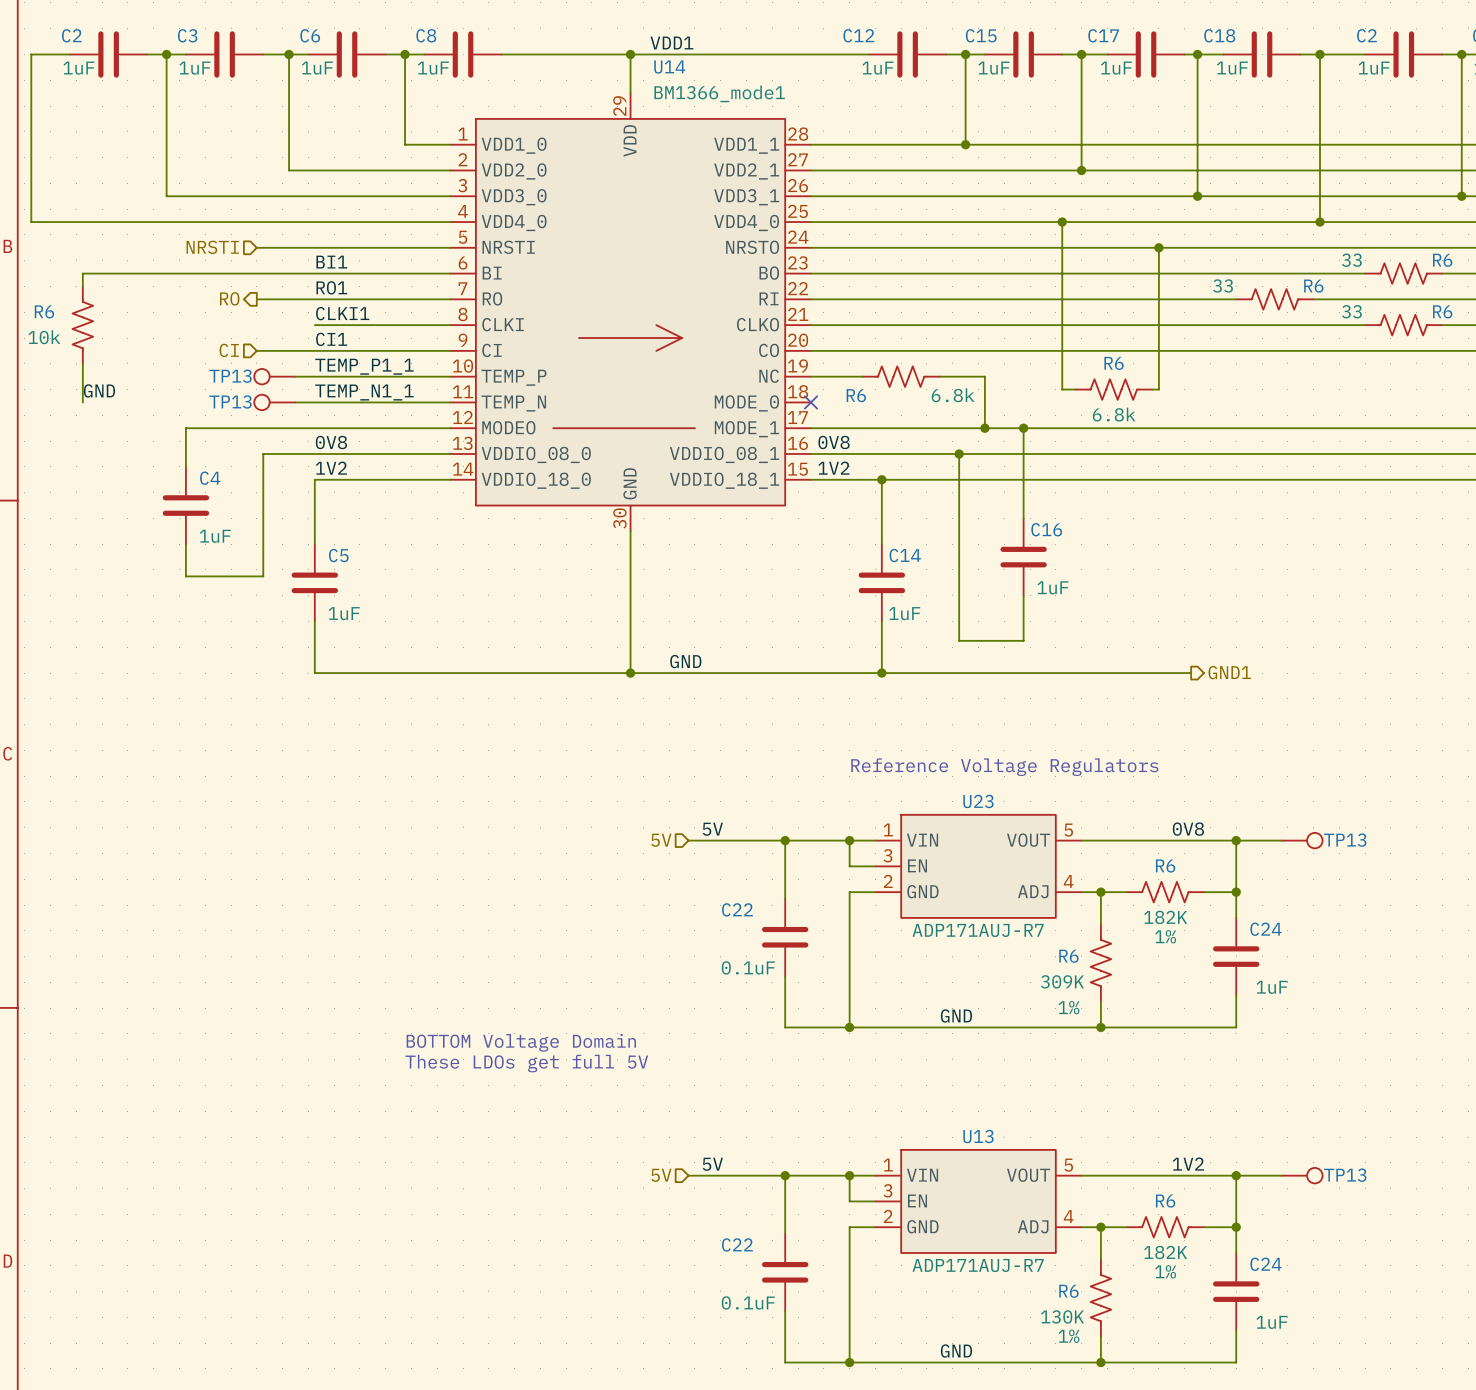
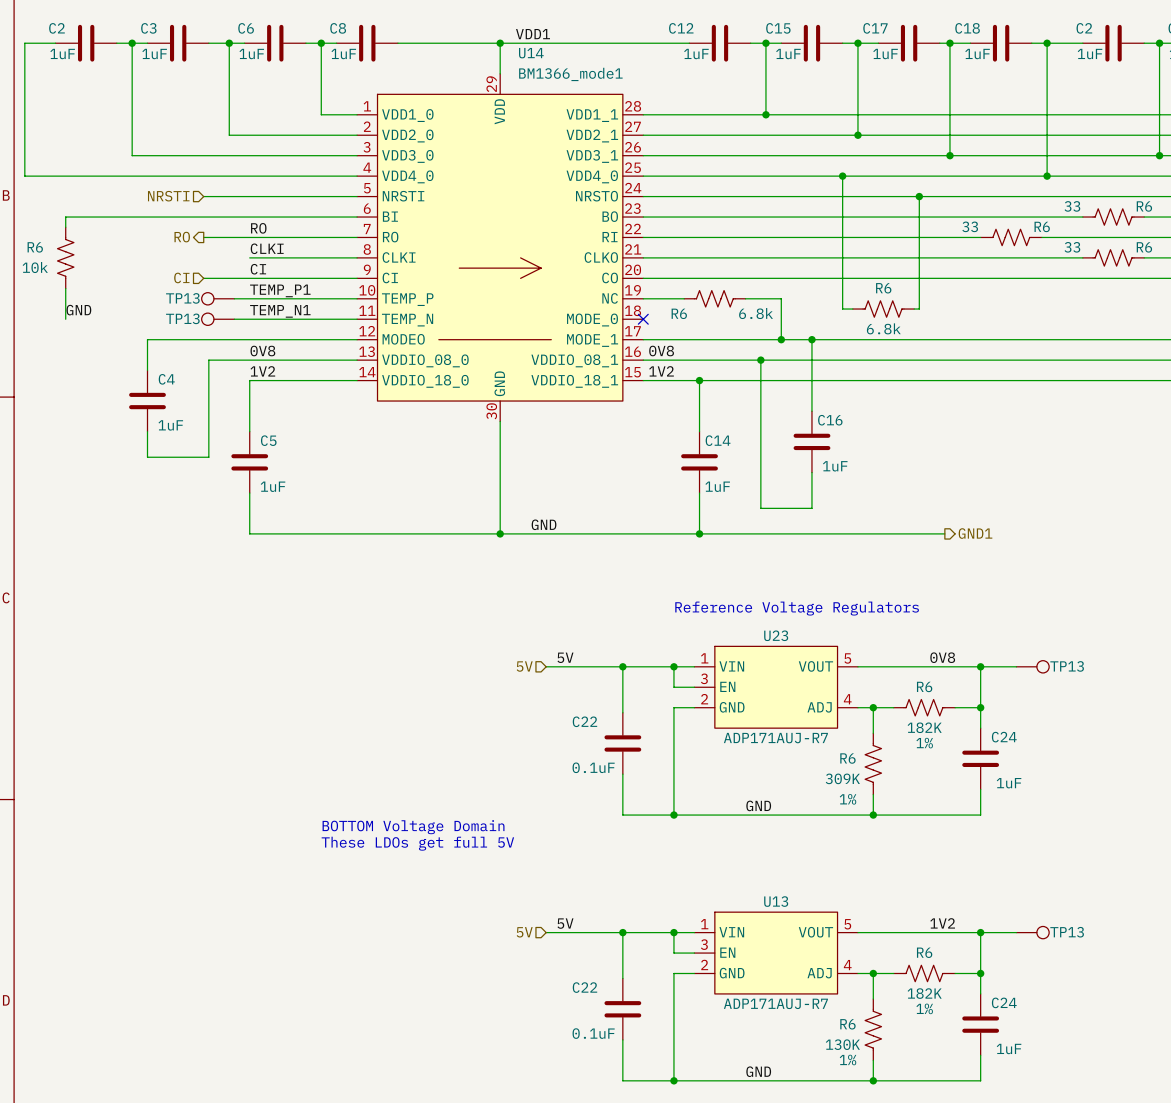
label: BI1 (331, 262) -> none
label: RO1 (331, 287) -> RO (258, 228)
label: CLKI1 (342, 313) -> CLKI (267, 248)
label: CI1 (331, 339) -> CI (258, 269)
label: TEMP_P1_1 (364, 366) -> TEMP_P1 (280, 290)
label: TEMP_N1_1 (364, 392) -> TEMP_N1 (280, 311)

